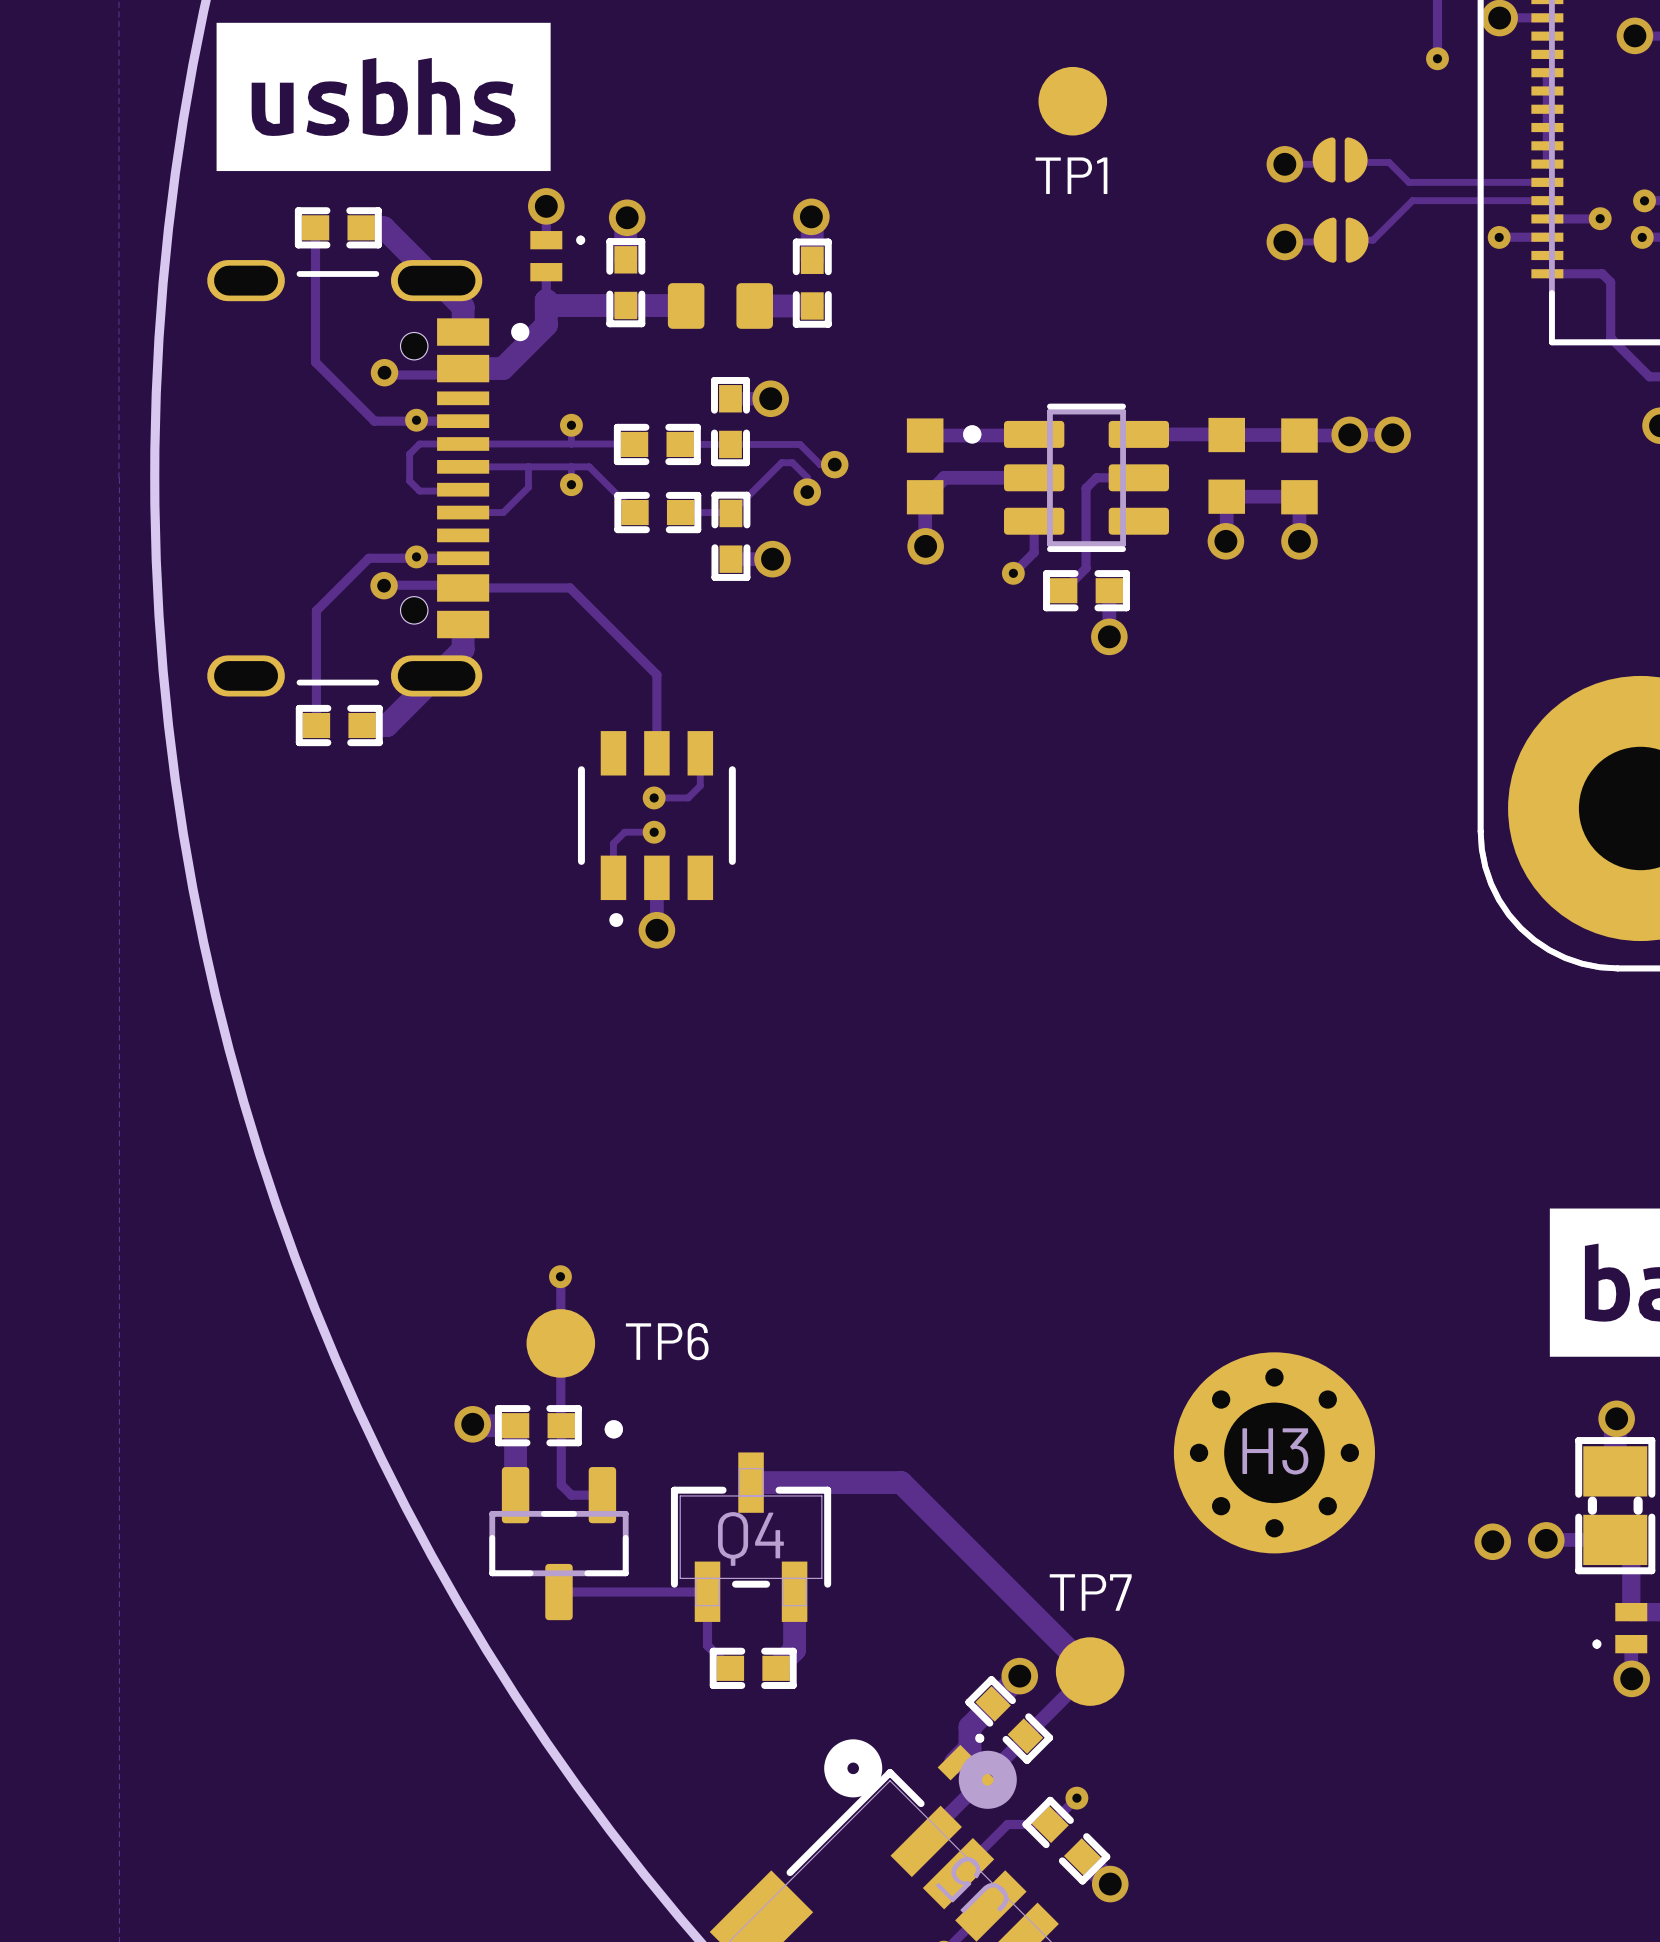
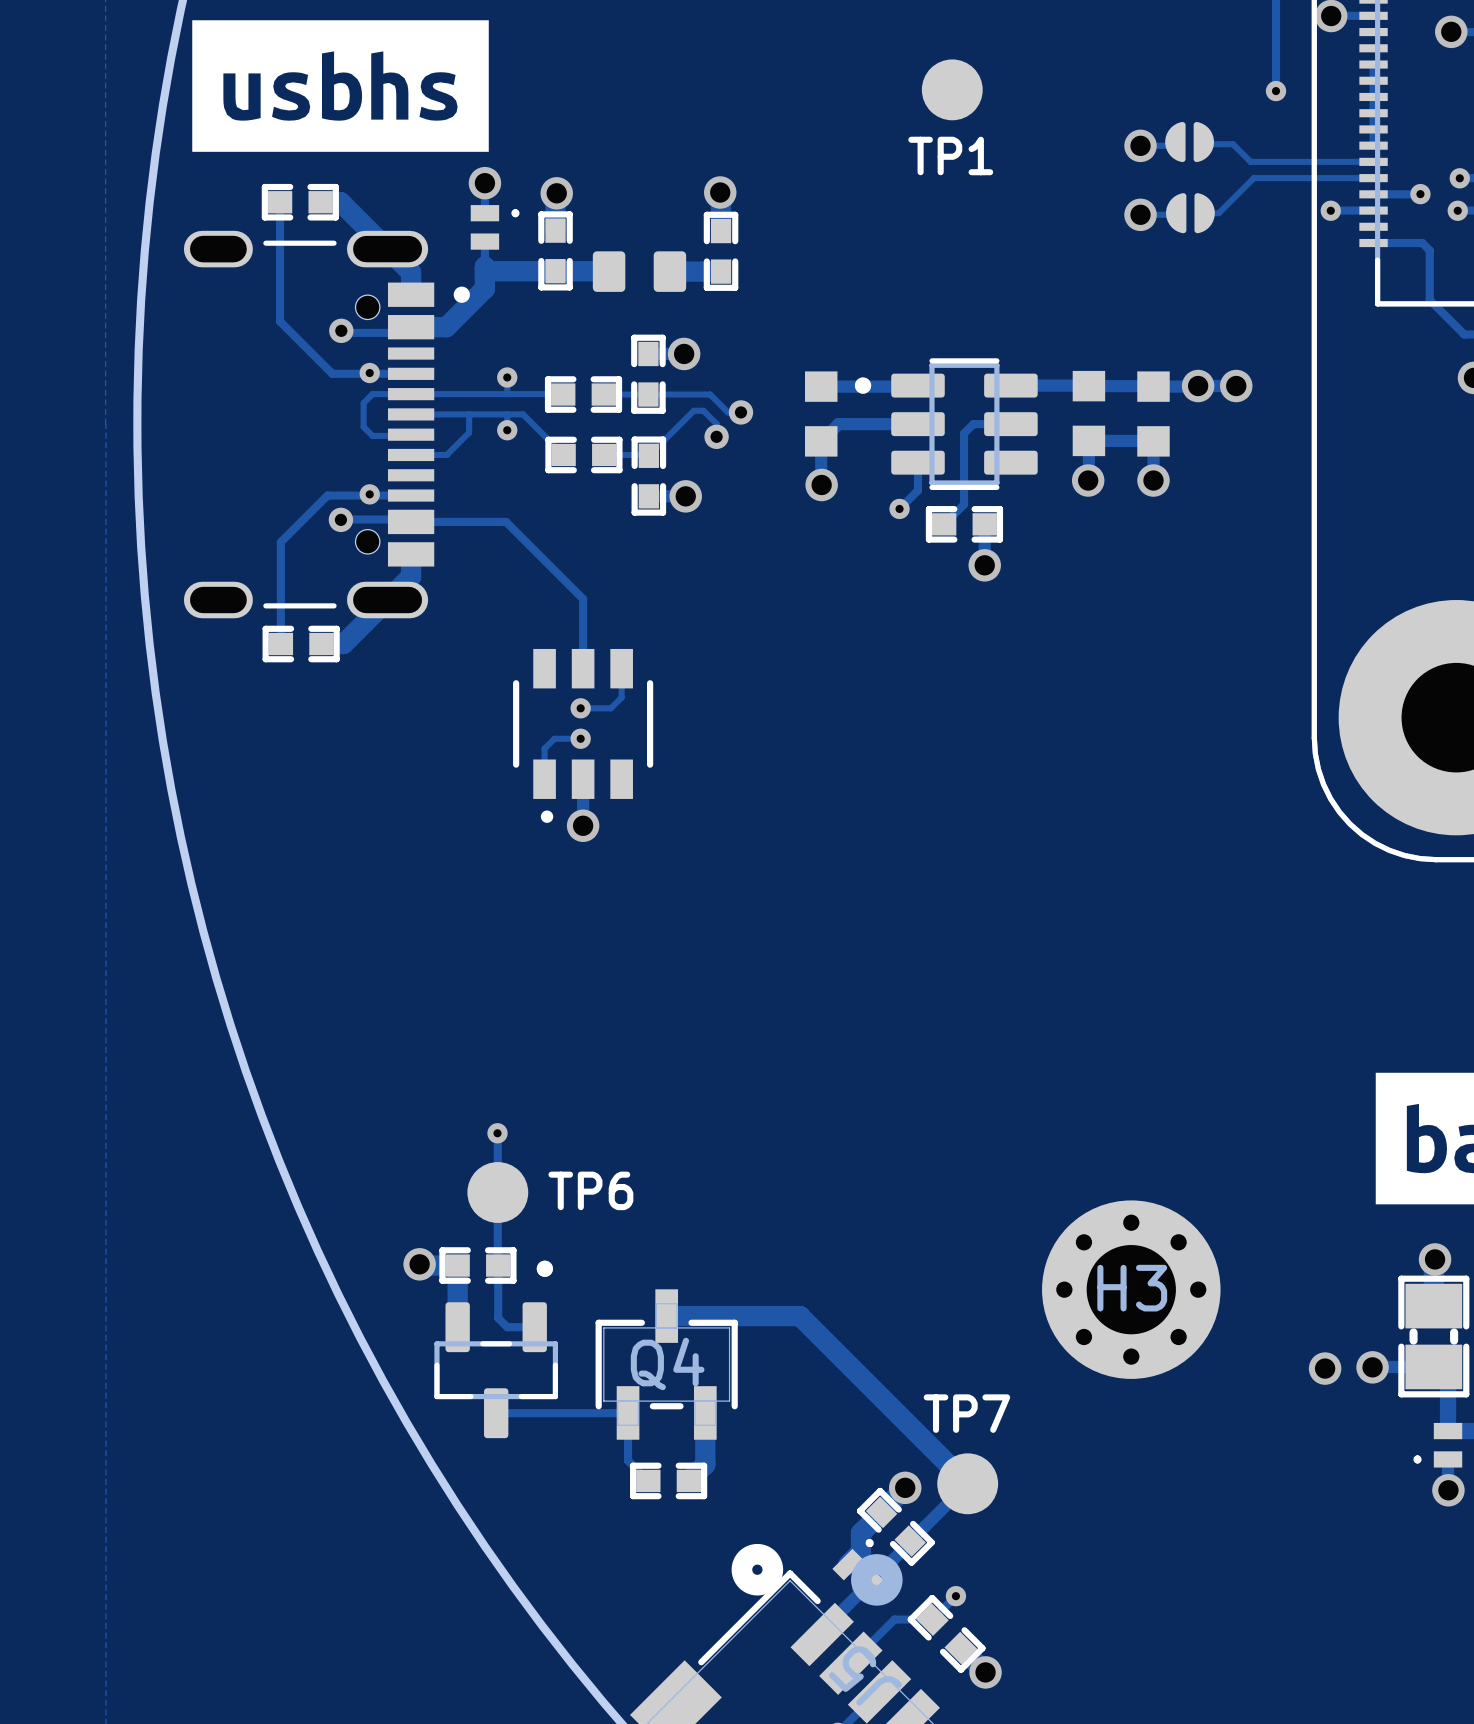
track: none -> (1276, 52) (1276, 91)
via position: (1437, 58) -> (1276, 91)

